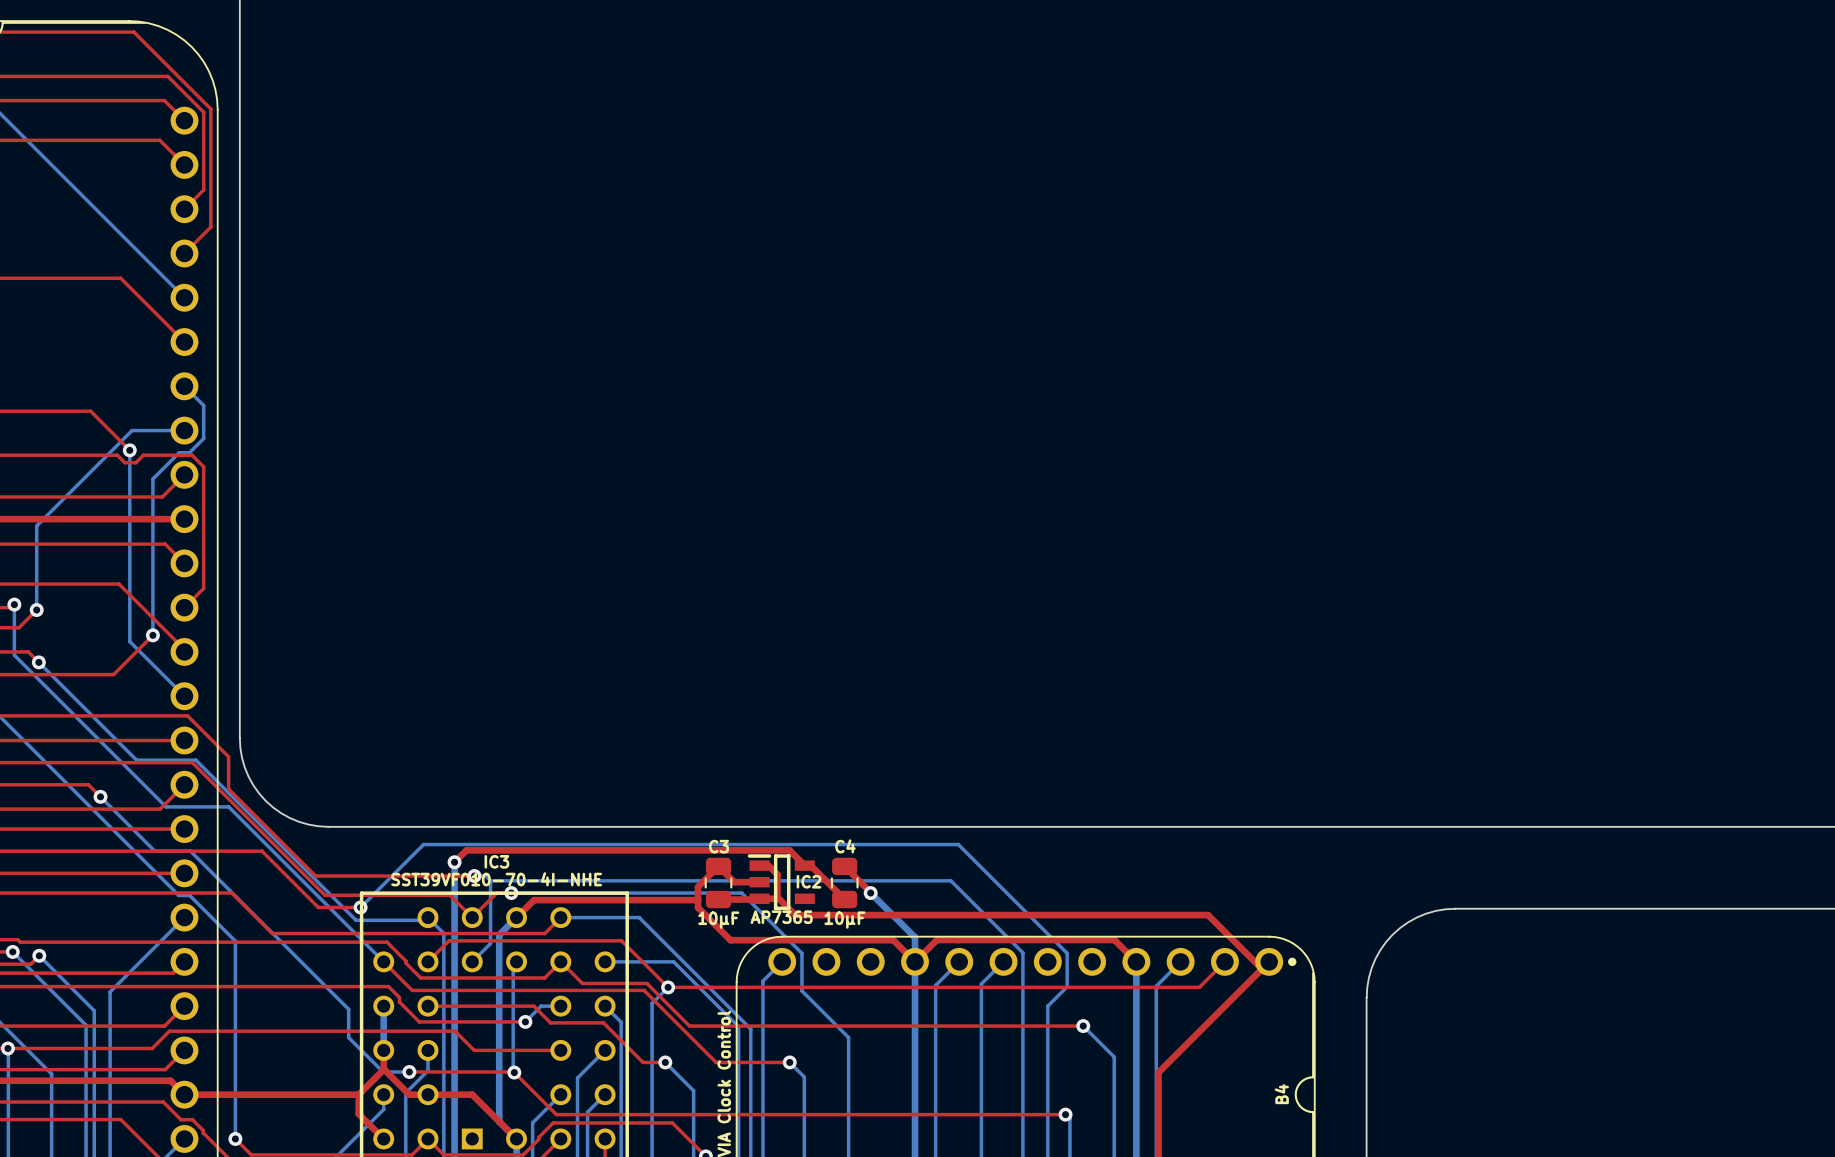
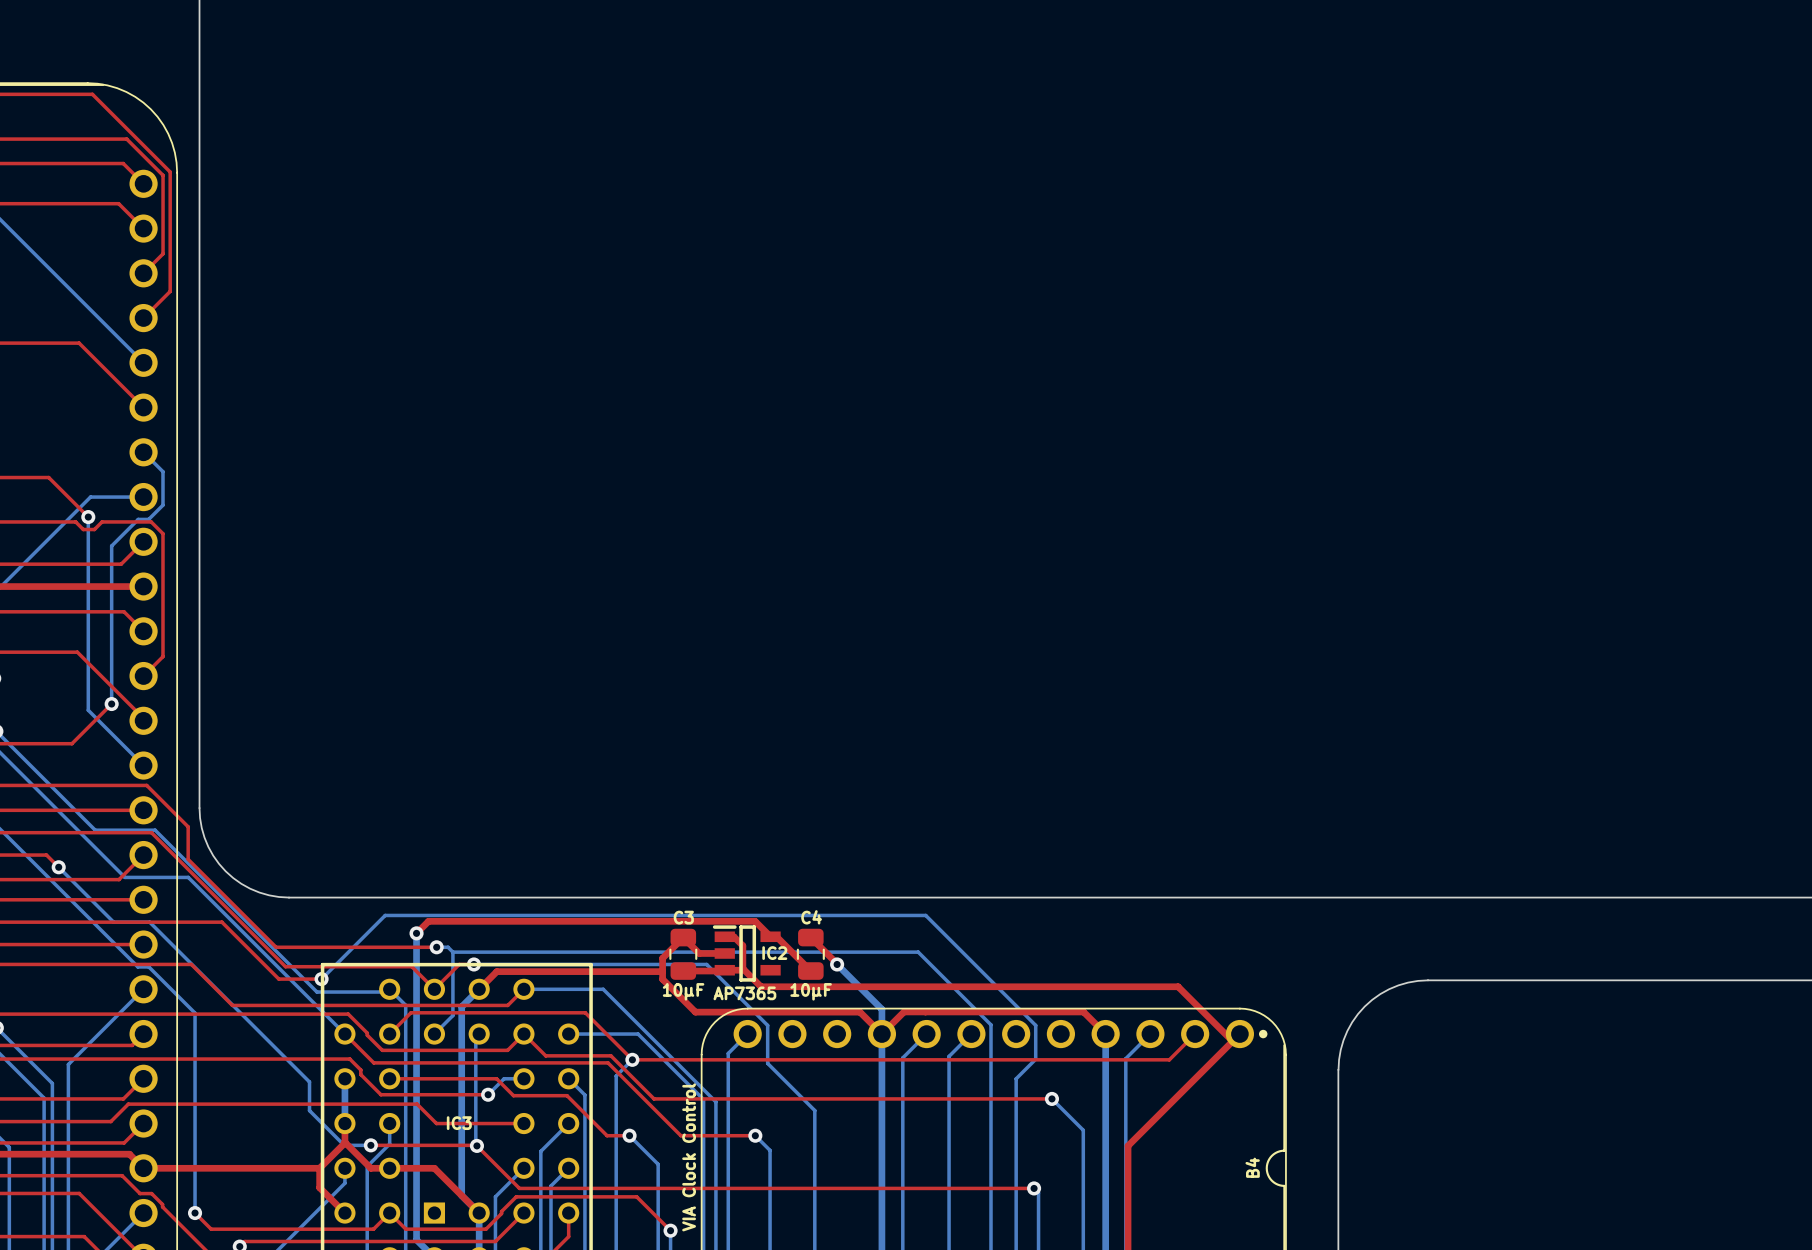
IC3 name position: IC3 (496, 861) -> IC3 (459, 1123)
IC3 value: SST39VF010-70-4I-NHE (496, 879) -> none
IC2 text: AP7365 (781, 917) -> none
IC2 text: none -> AP7365 (744, 993)

